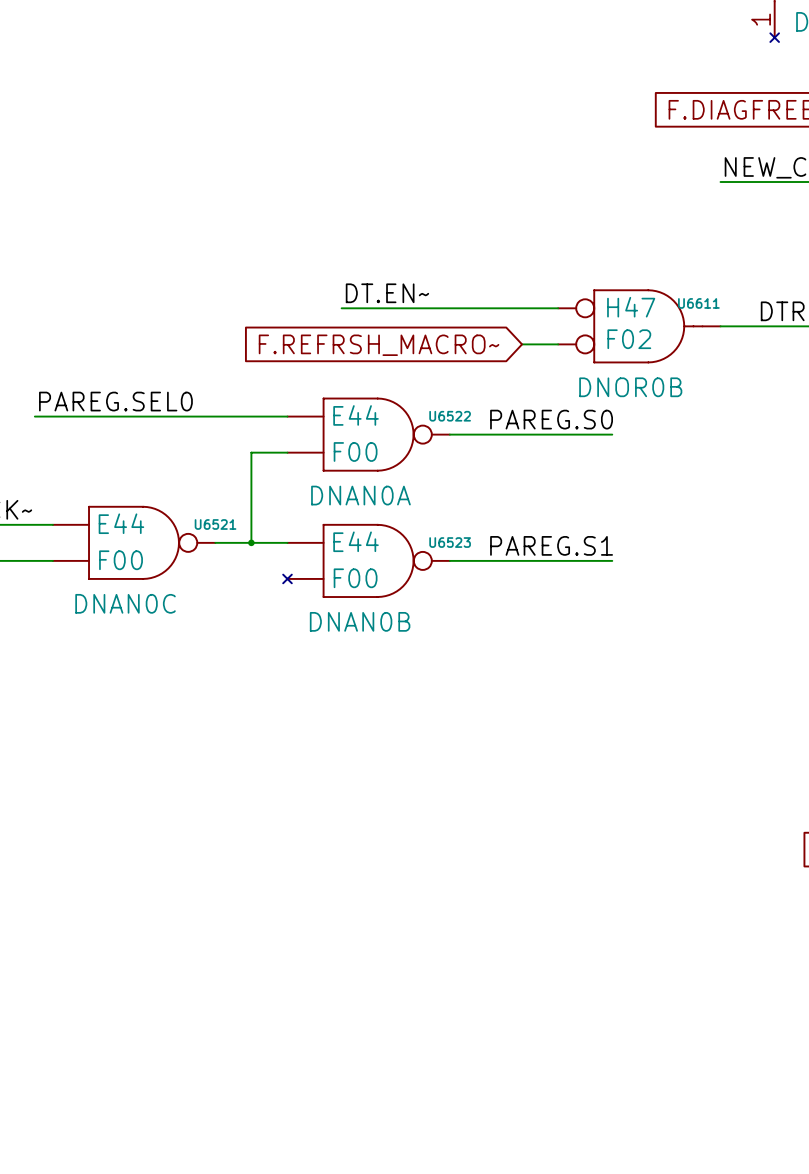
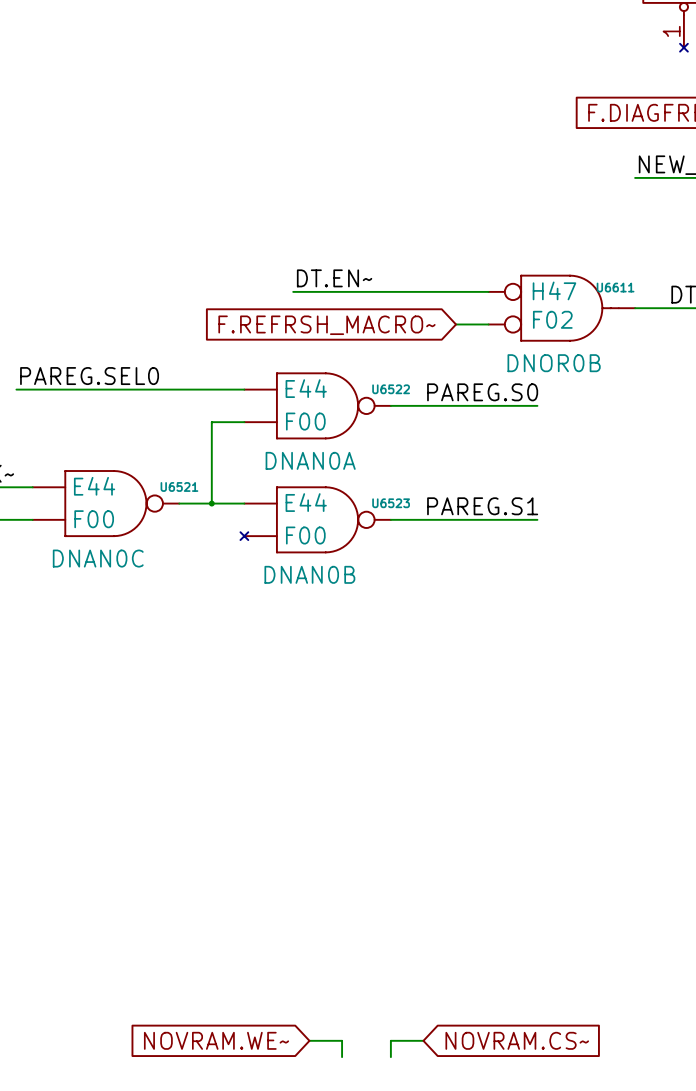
global label: none -> NOVRAM.WE~ (216, 1040)
wire: none -> (309, 1040) (342, 1040) (342, 1057)
wire: none -> (423, 1040) (390, 1040) (390, 1057)
global label: none -> NOVRAM.CS~ (517, 1040)

